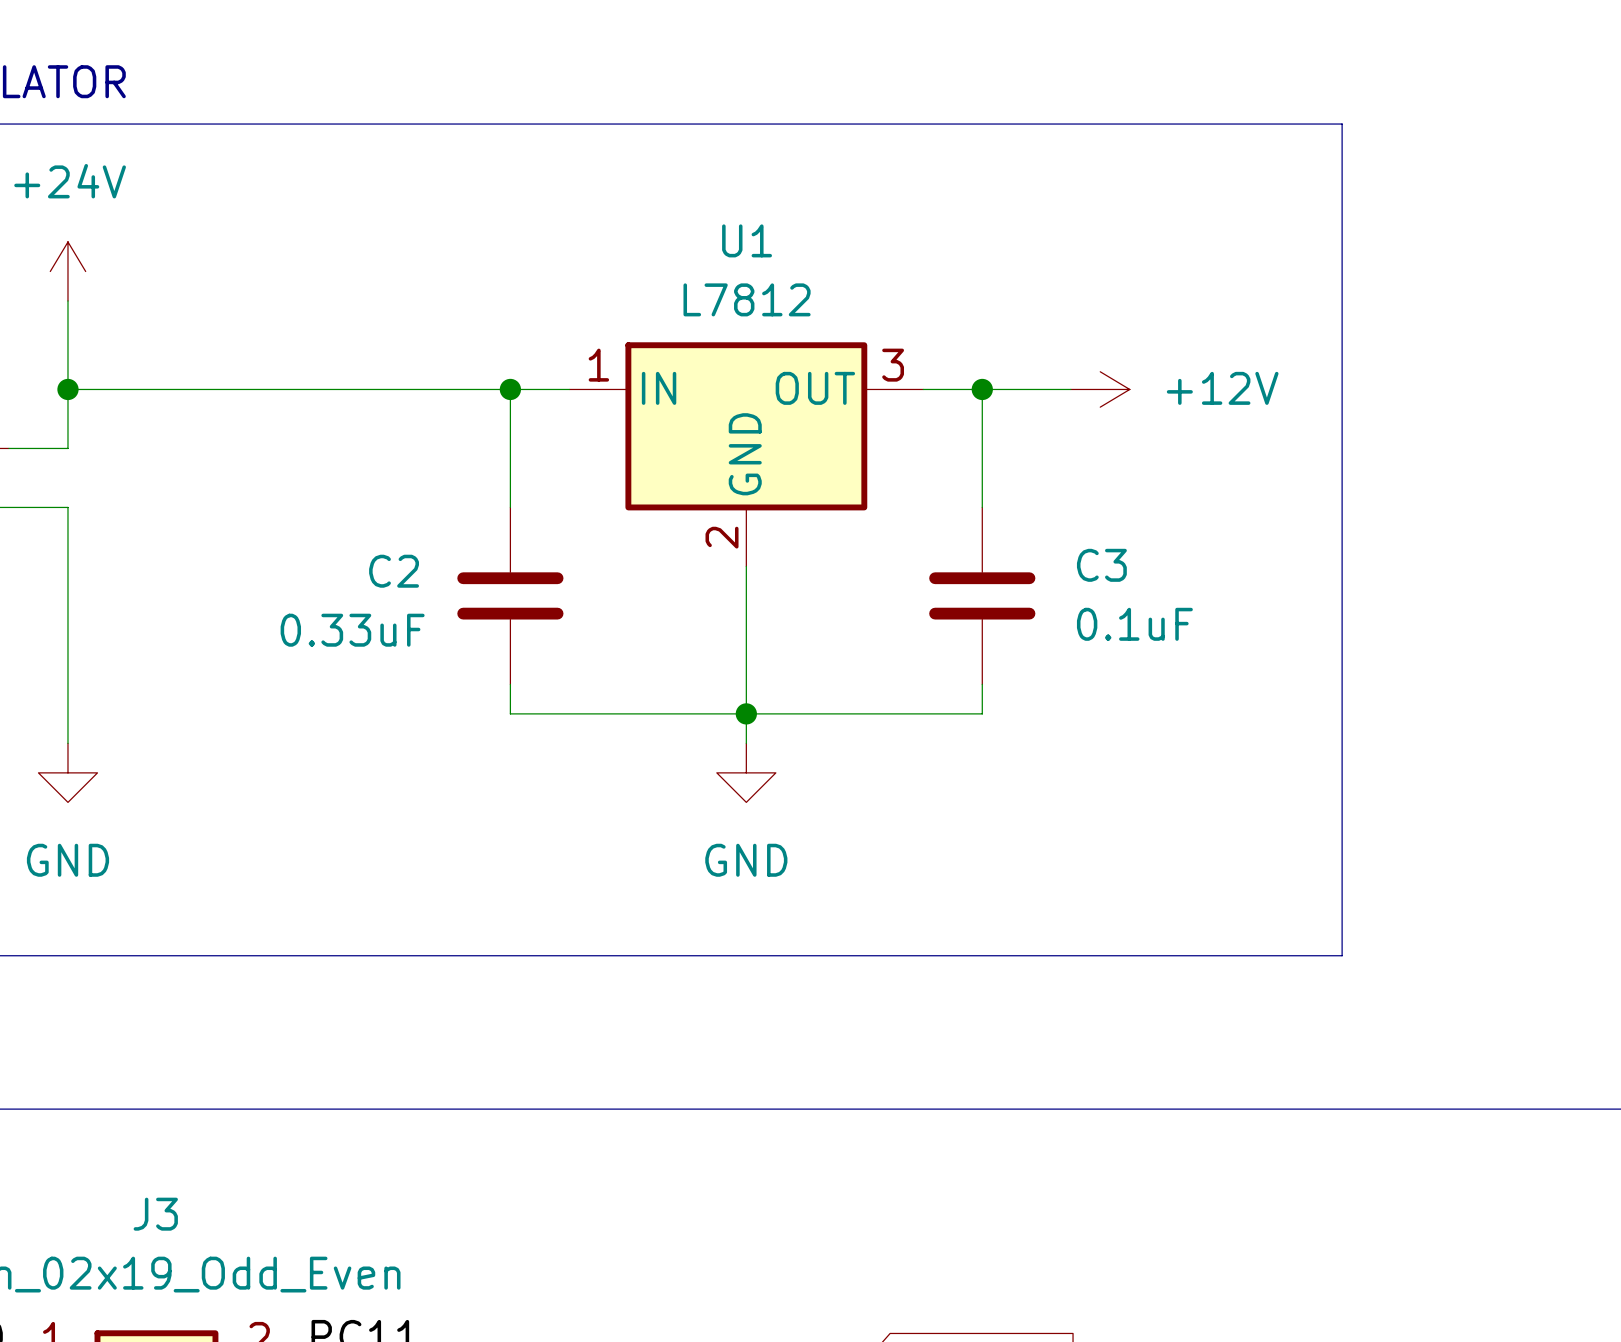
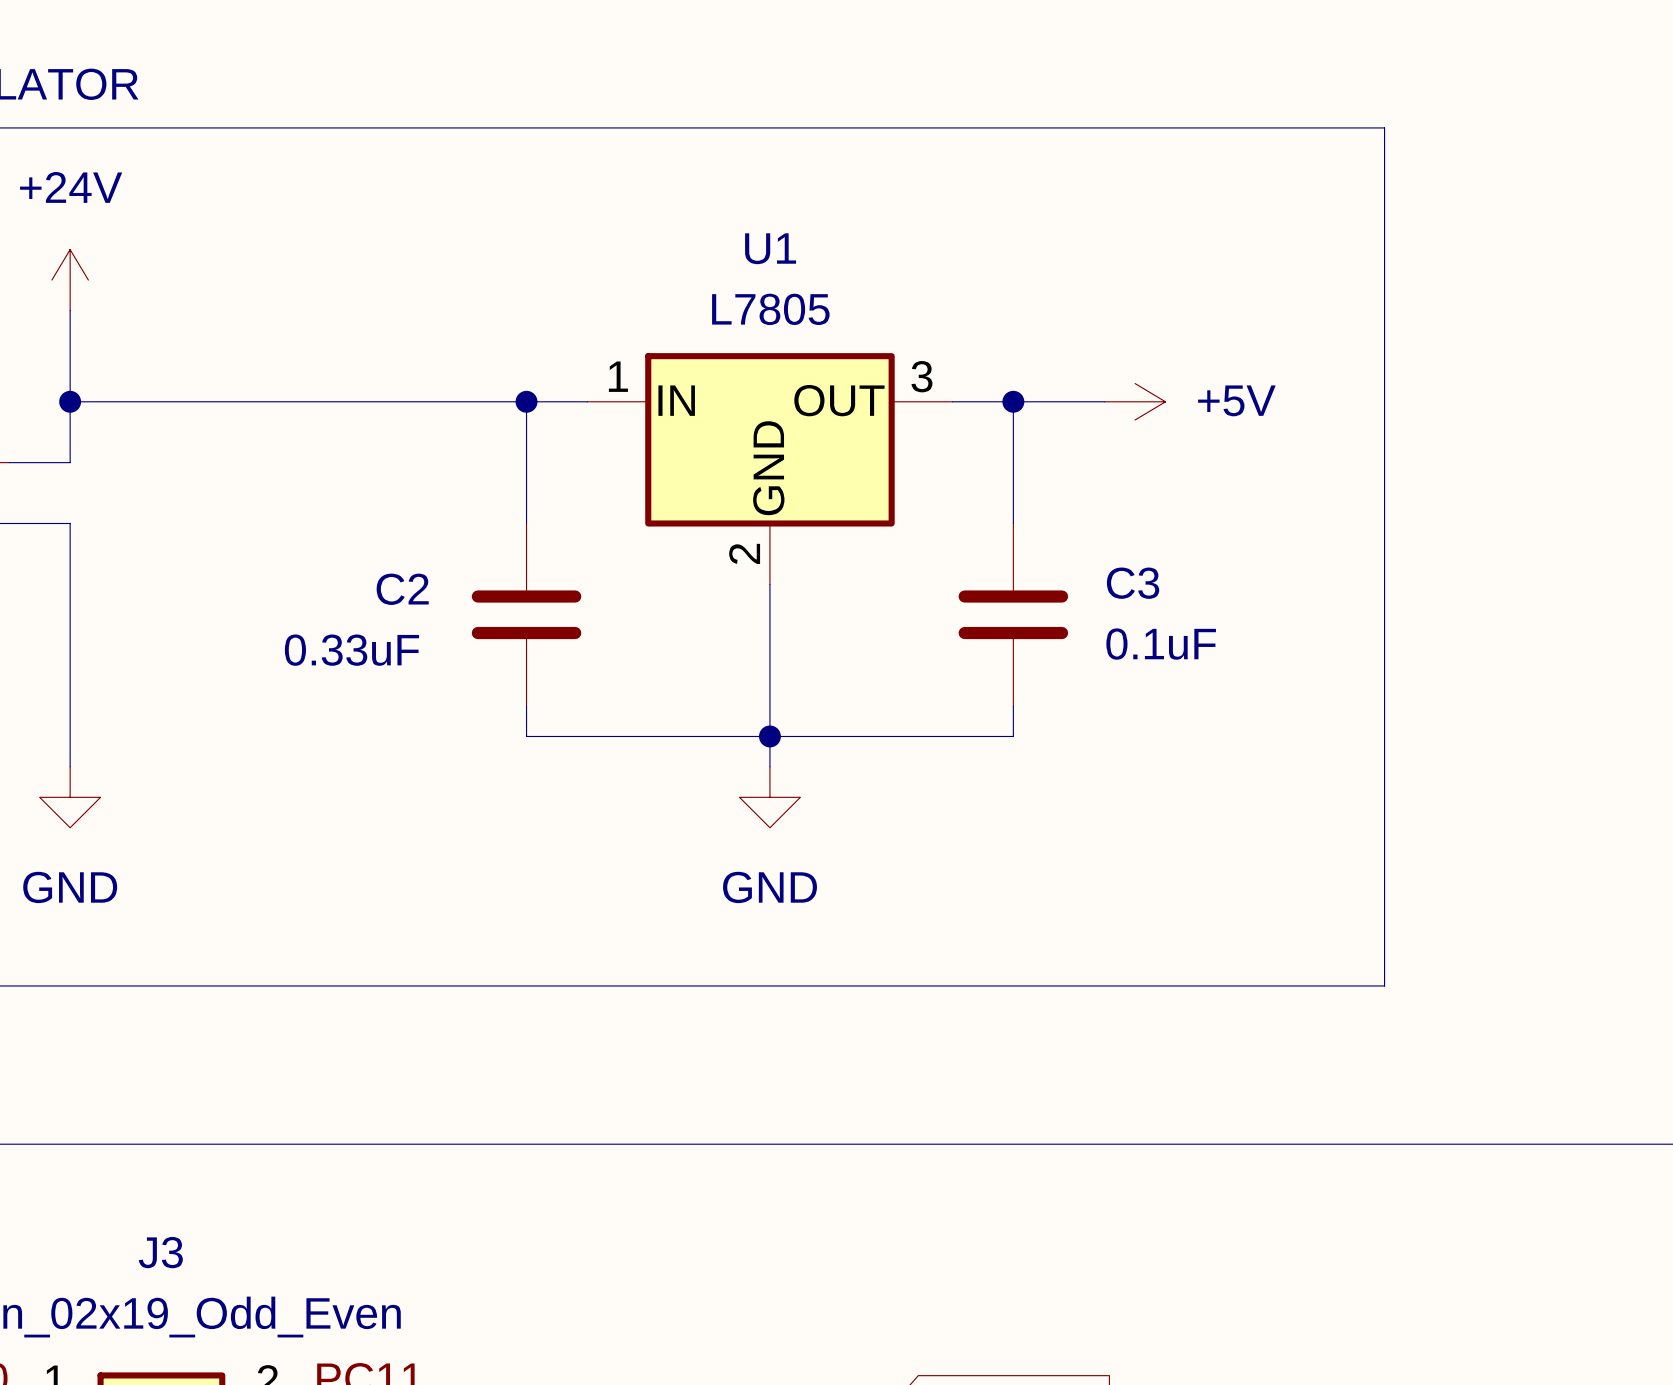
U1 value: L7812 (747, 299) -> L7805 (770, 309)
power symbol: +12V (1100, 389) -> +5V (1135, 401)

